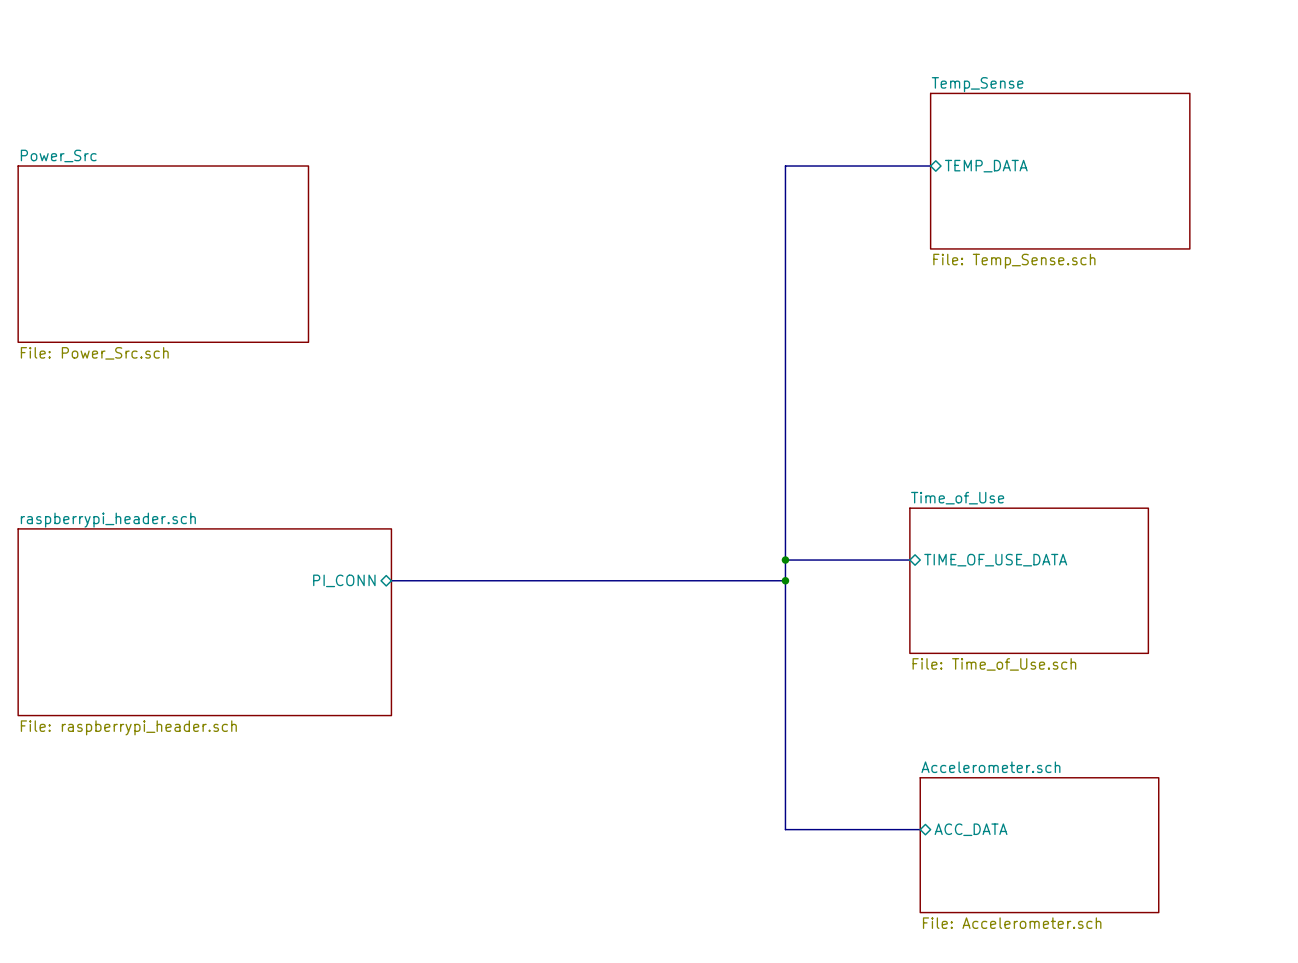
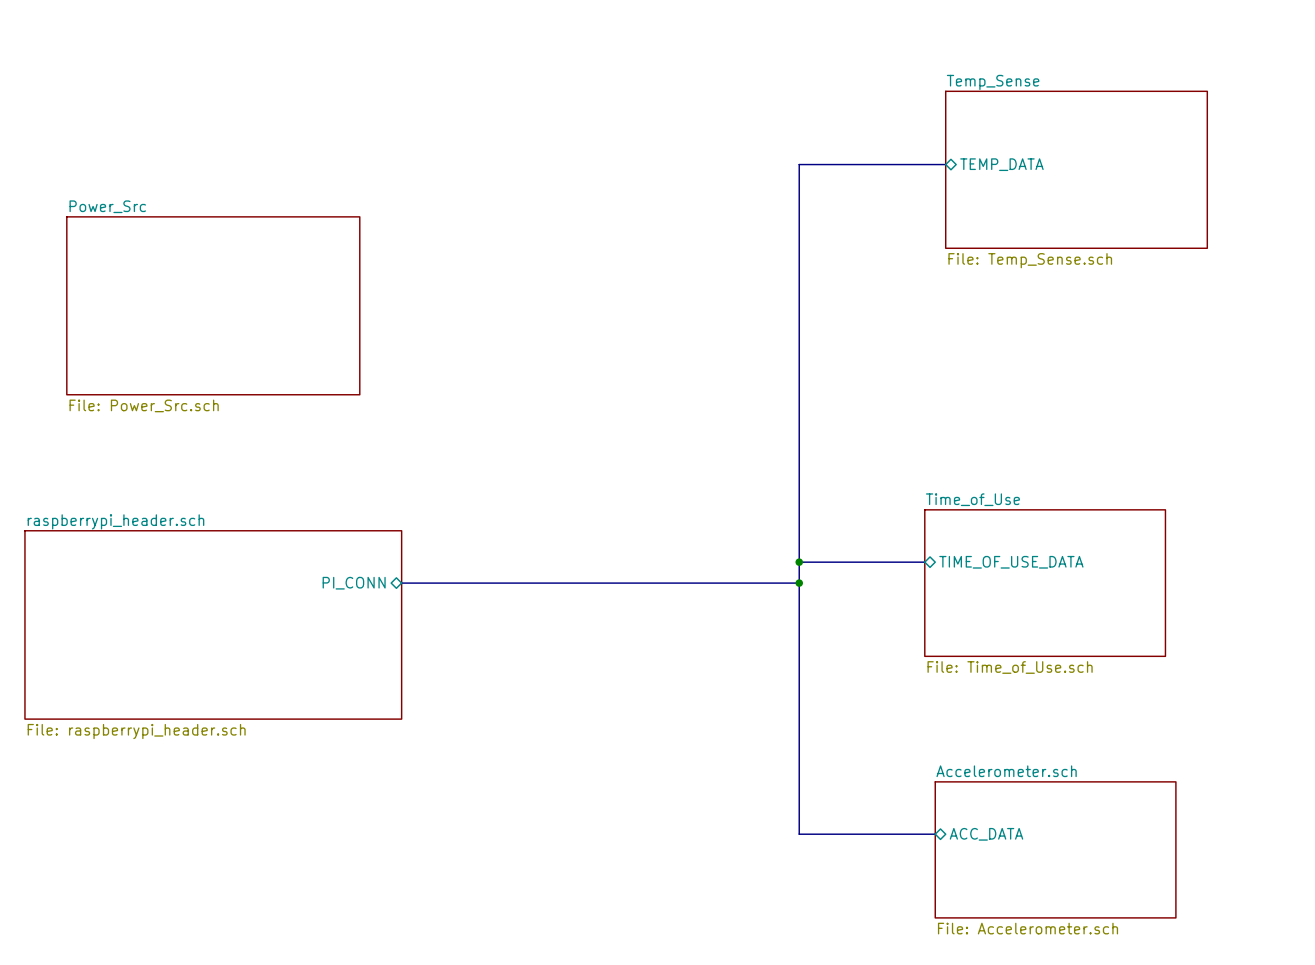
sheet Power_Src position: (163, 254) -> (213, 305)

